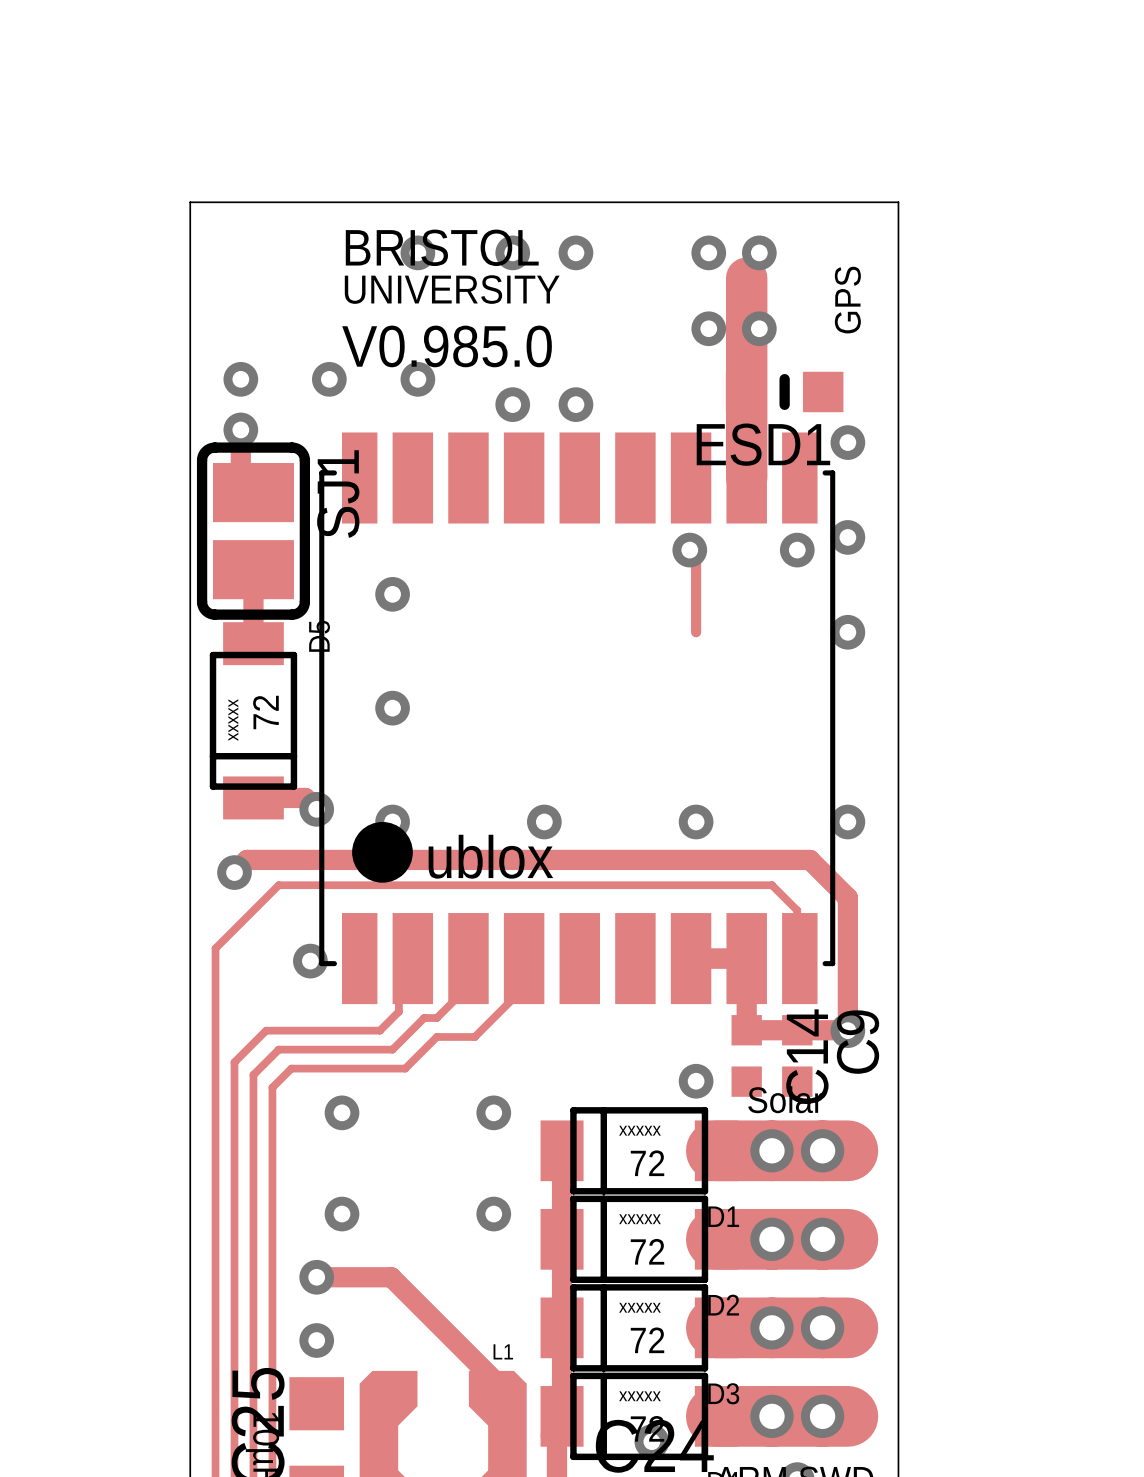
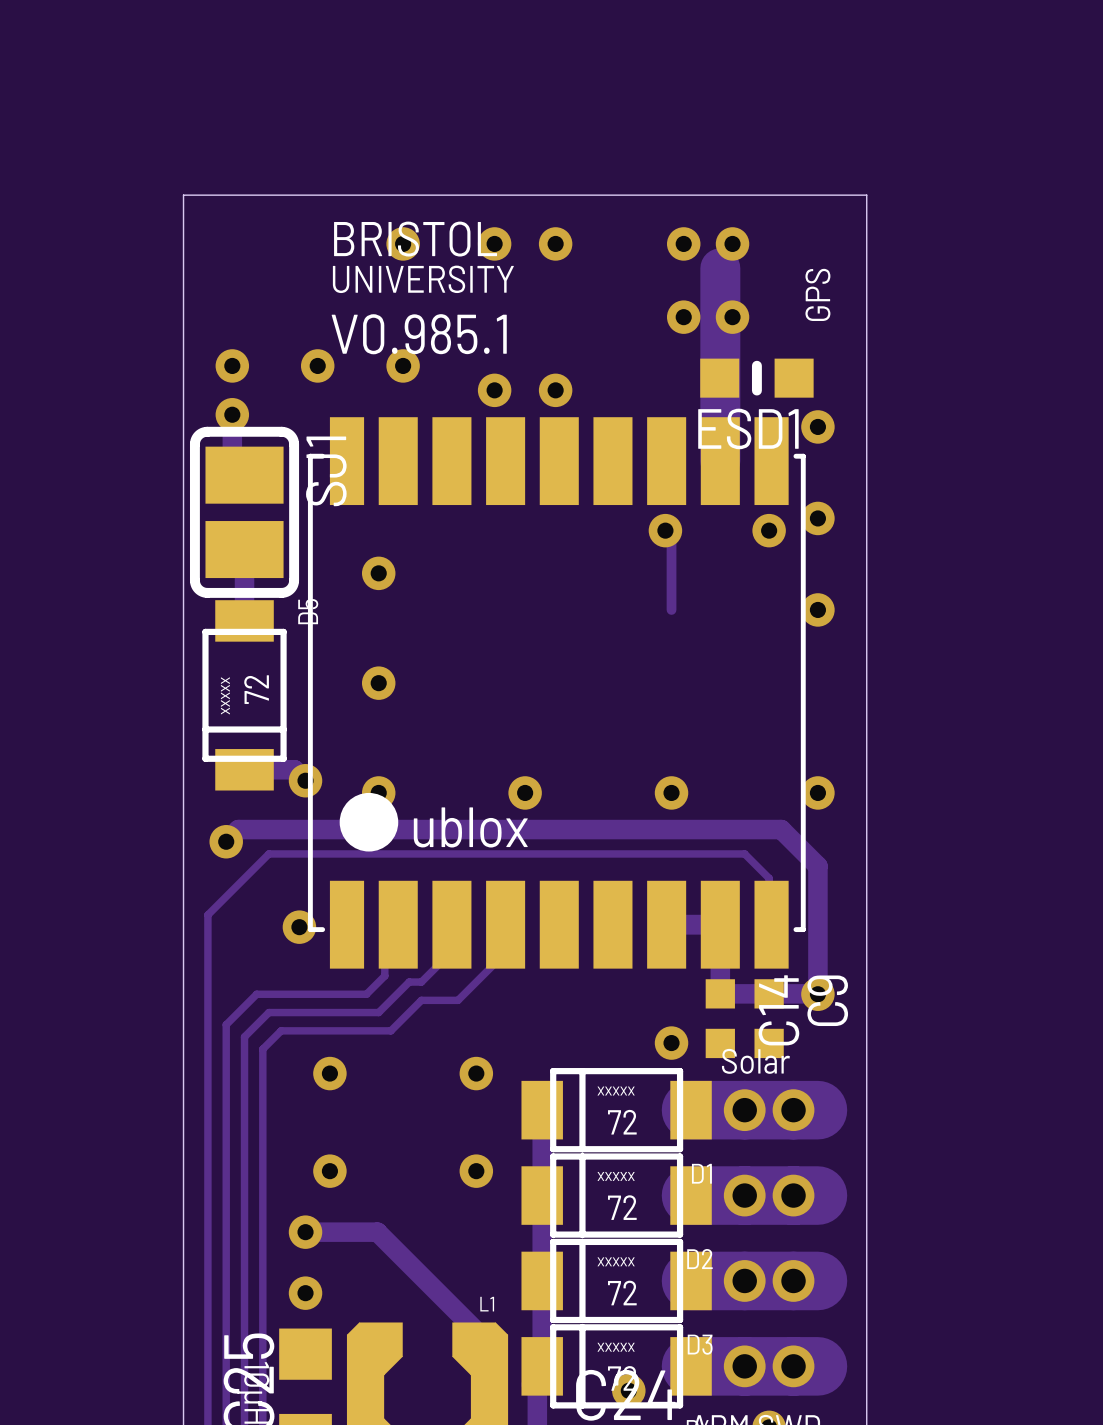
text: V0.985.0 (447, 346) -> V0.985.1 (419, 334)

